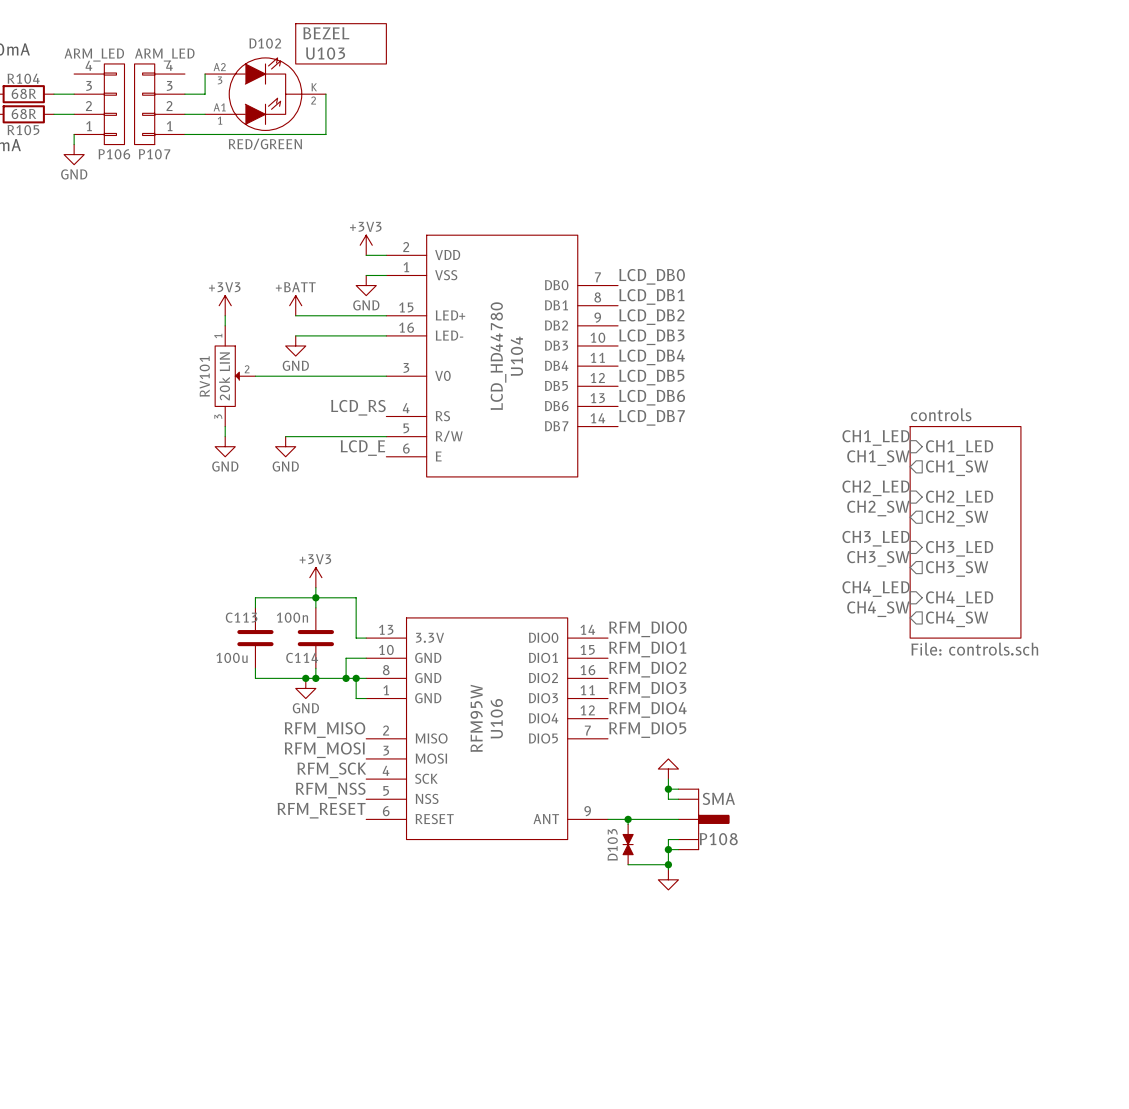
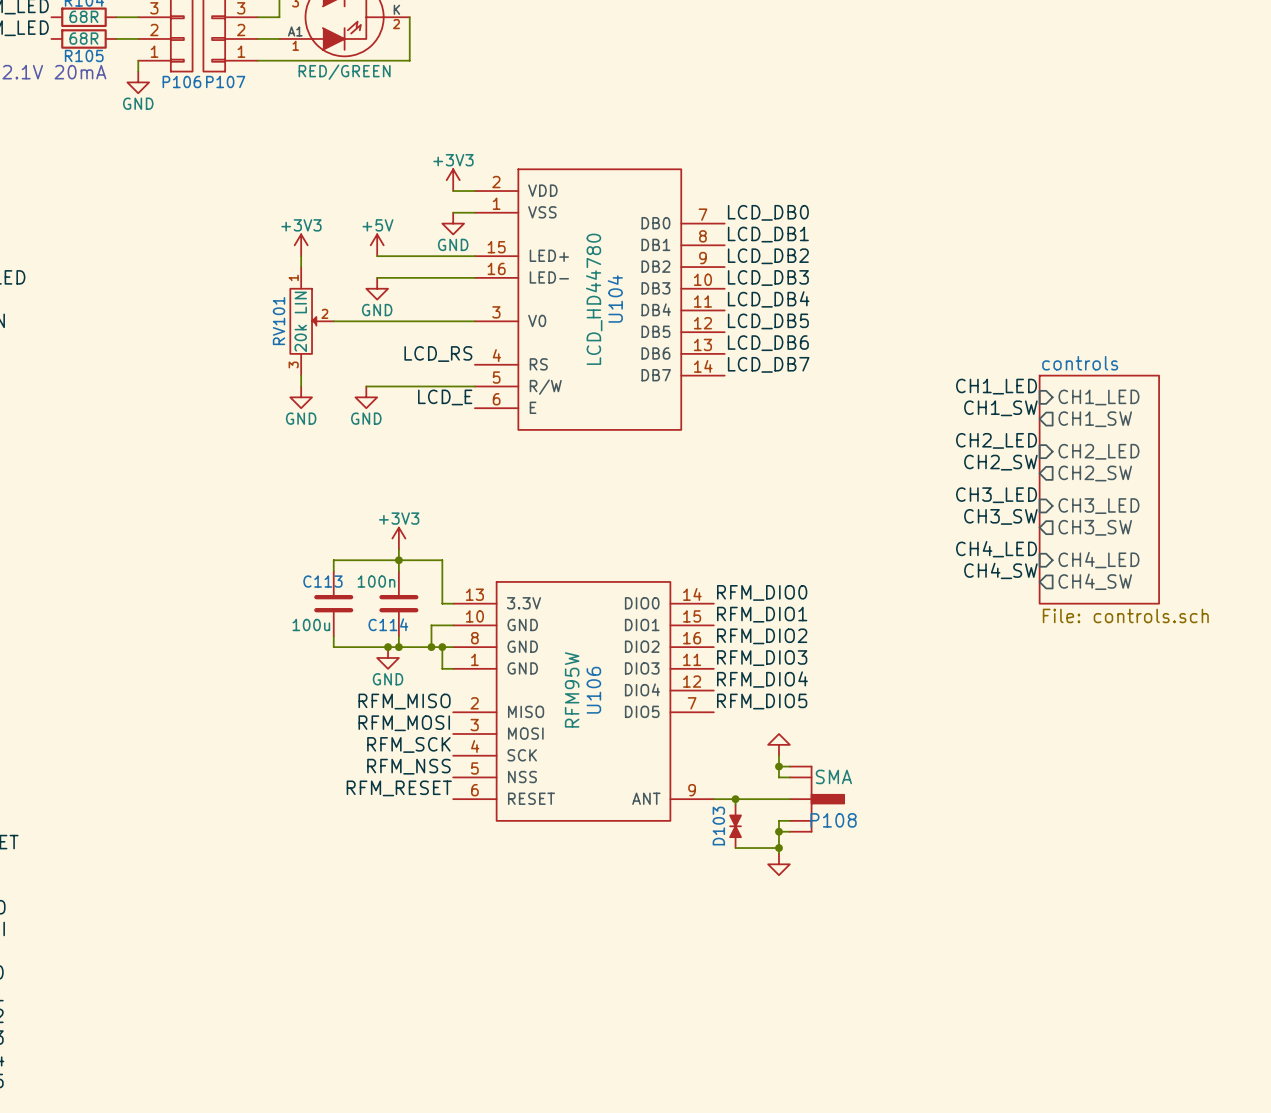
power symbol: +BATT (295, 305) -> +5V (377, 245)

